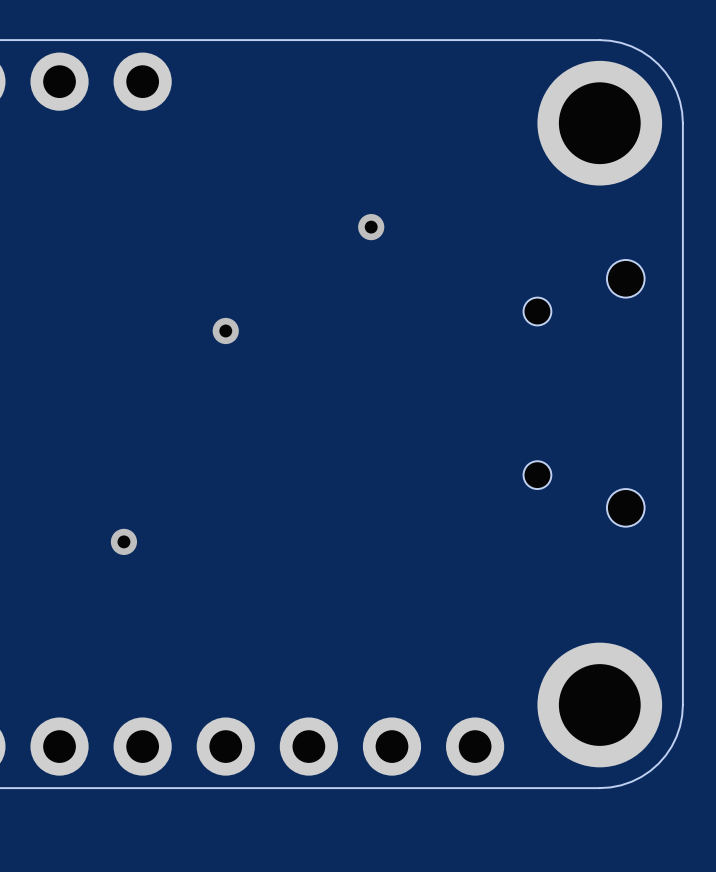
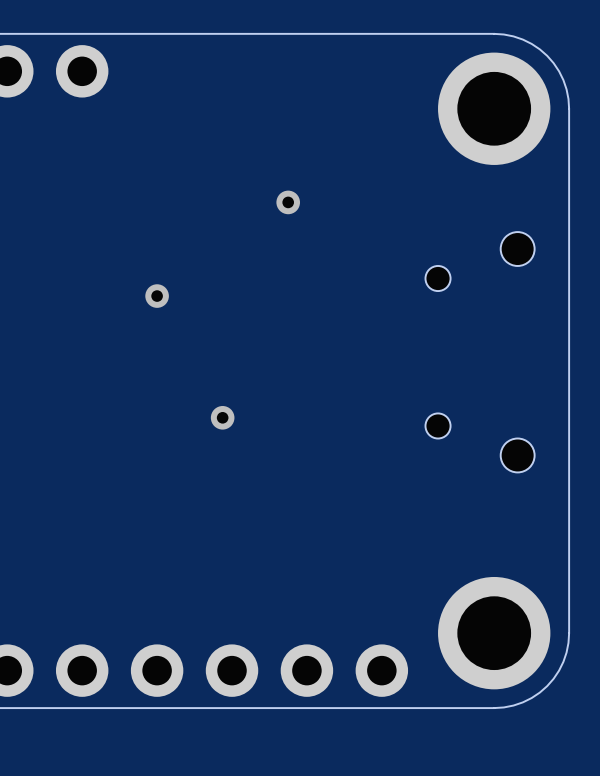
via position: (123, 541) -> (222, 417)

